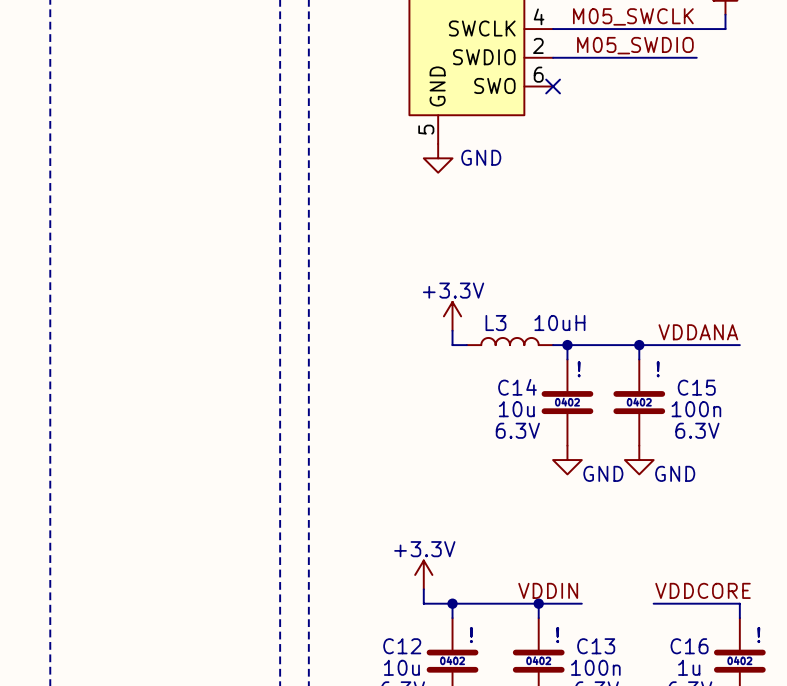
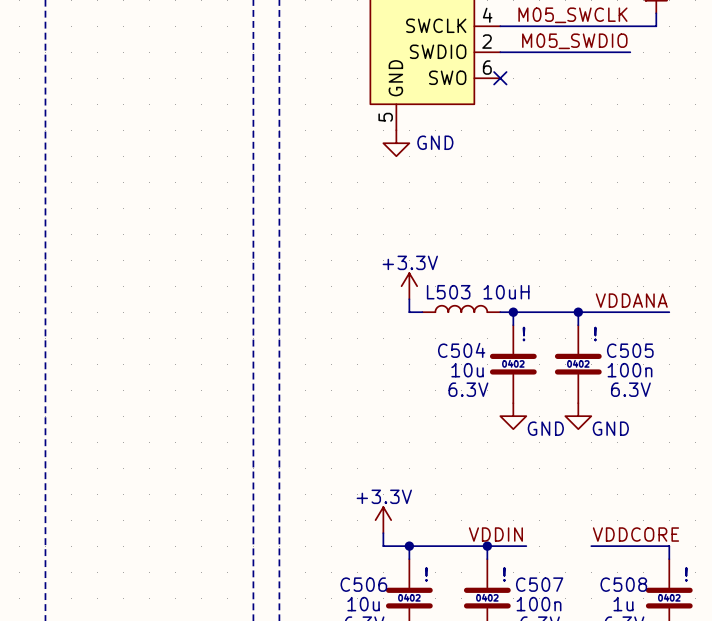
L3 name: L3 (495, 323) -> L503 (448, 292)
C14 name: C14 (517, 387) -> C504 (461, 350)
C15 name: C15 (696, 387) -> C505 (630, 350)
C12 name: C12 (402, 646) -> C506 (363, 584)
C13 name: C13 (596, 646) -> C507 (539, 584)
C16 name: C16 (689, 646) -> C508 (623, 584)

